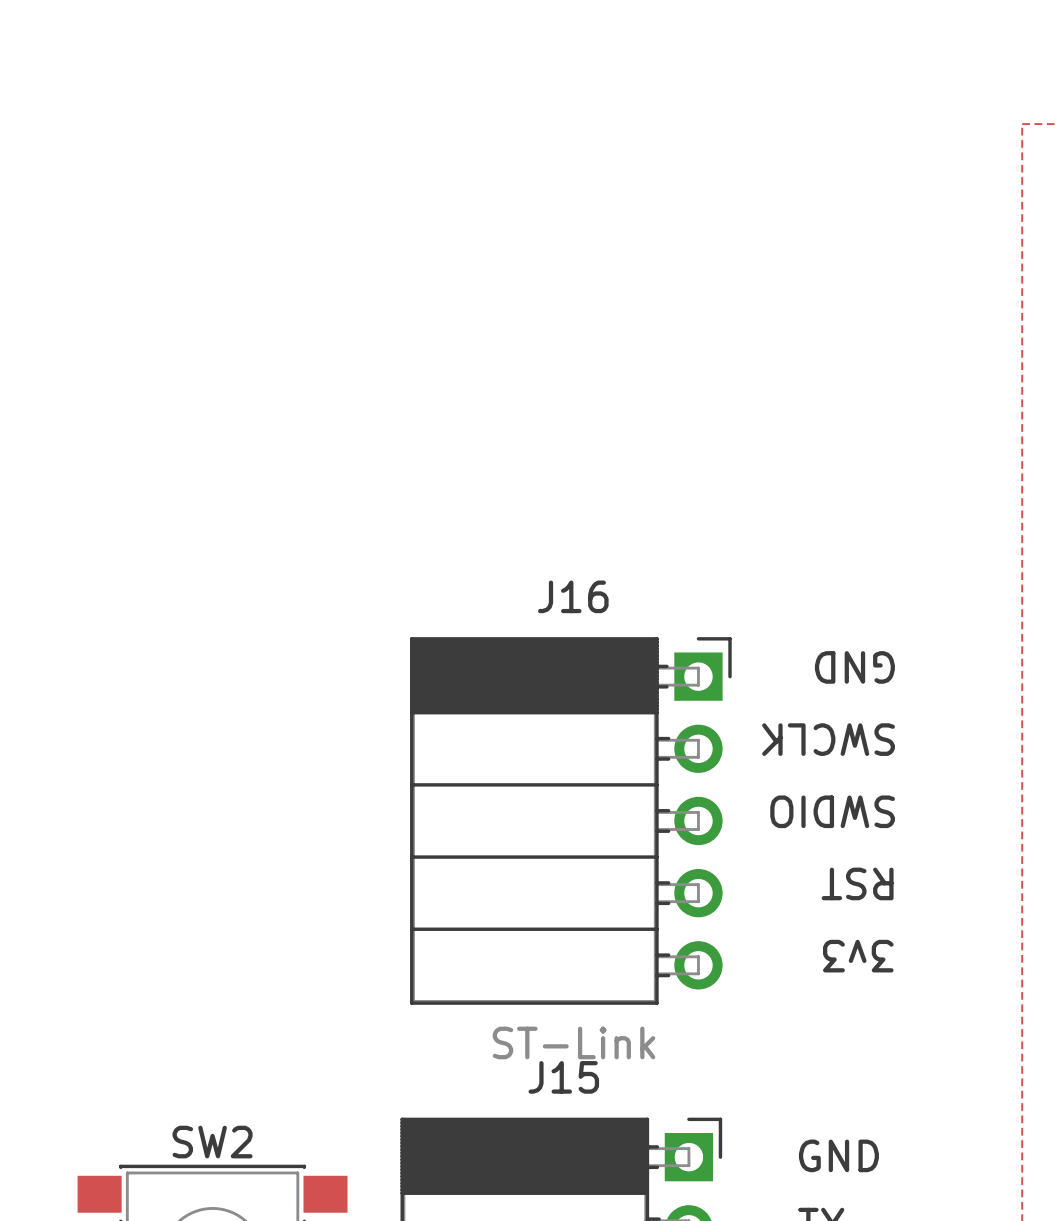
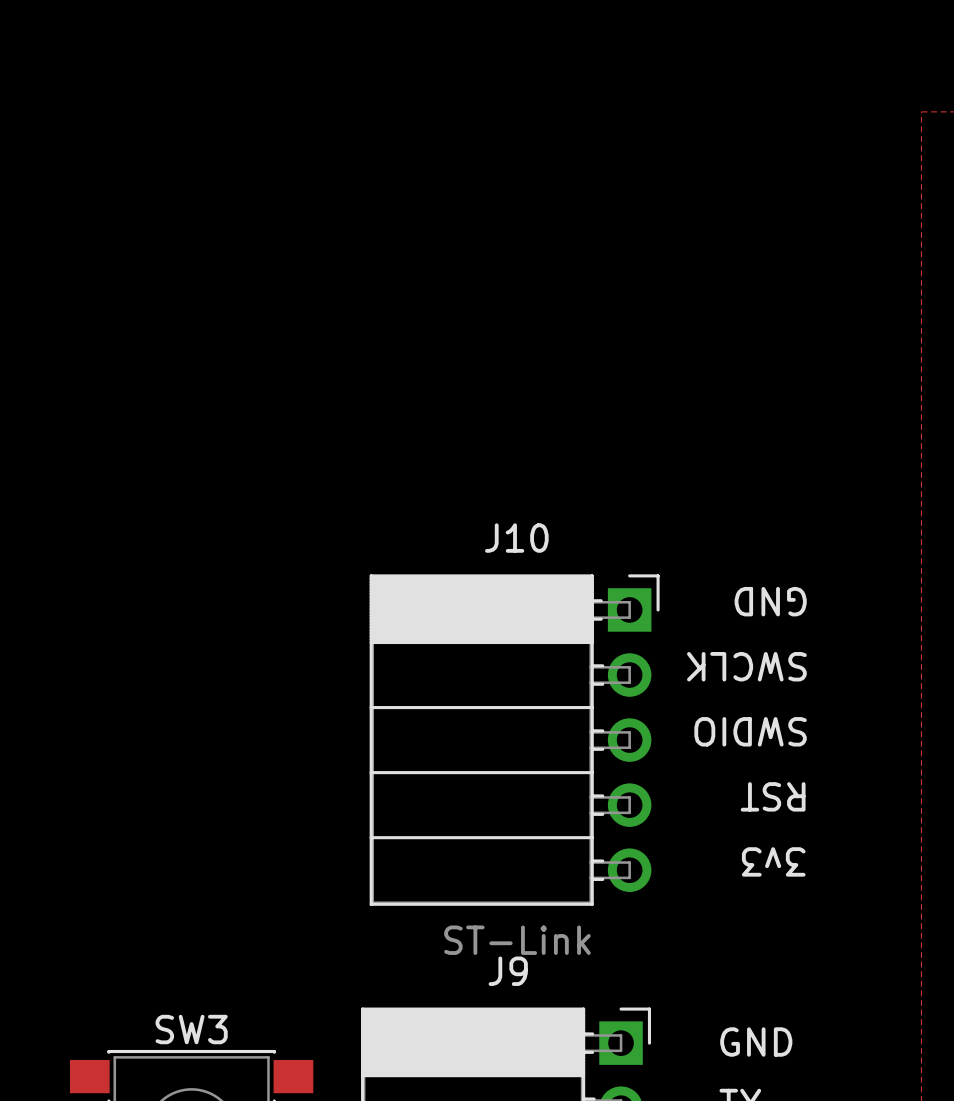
J16 name: J16 (573, 596) -> J10 (516, 538)
J15 name: J15 (563, 1077) -> J9 (508, 971)
SW2 name: SW2 (212, 1142) -> SW3 (191, 1029)

